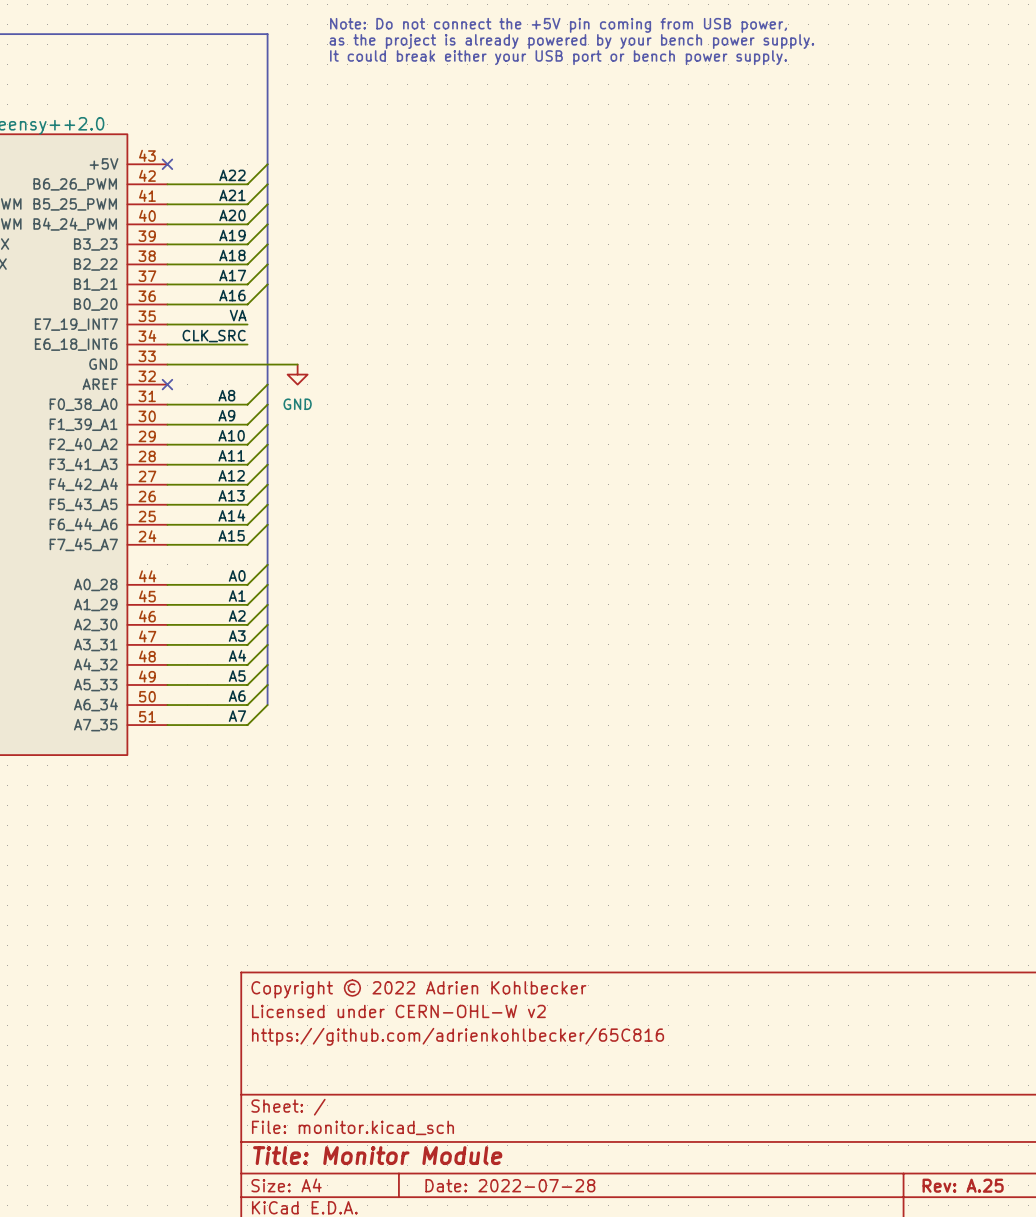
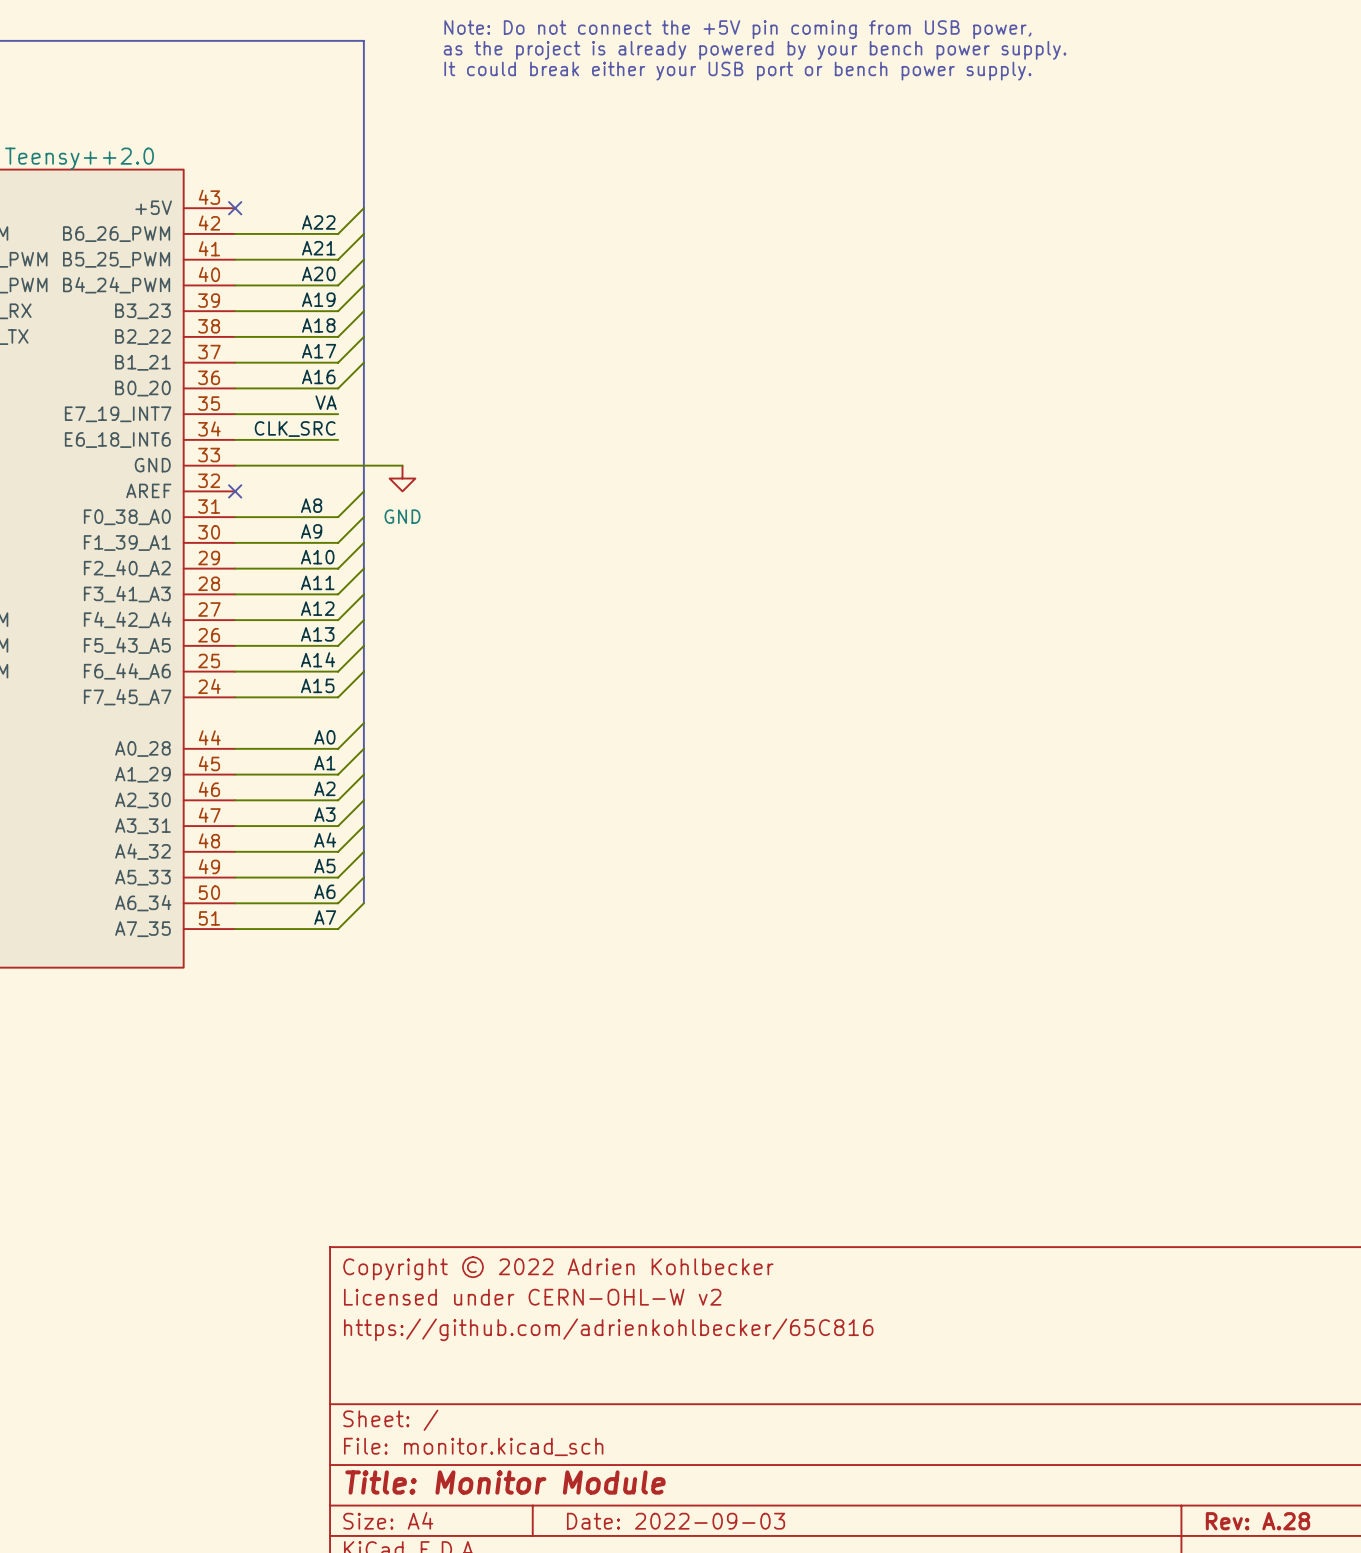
title block: Date: 2022-07-28 (510, 1185) -> Date: 2022-09-03 (676, 1521)
title block: Rev: A.25 (963, 1185) -> Rev: A.28 (1257, 1521)

